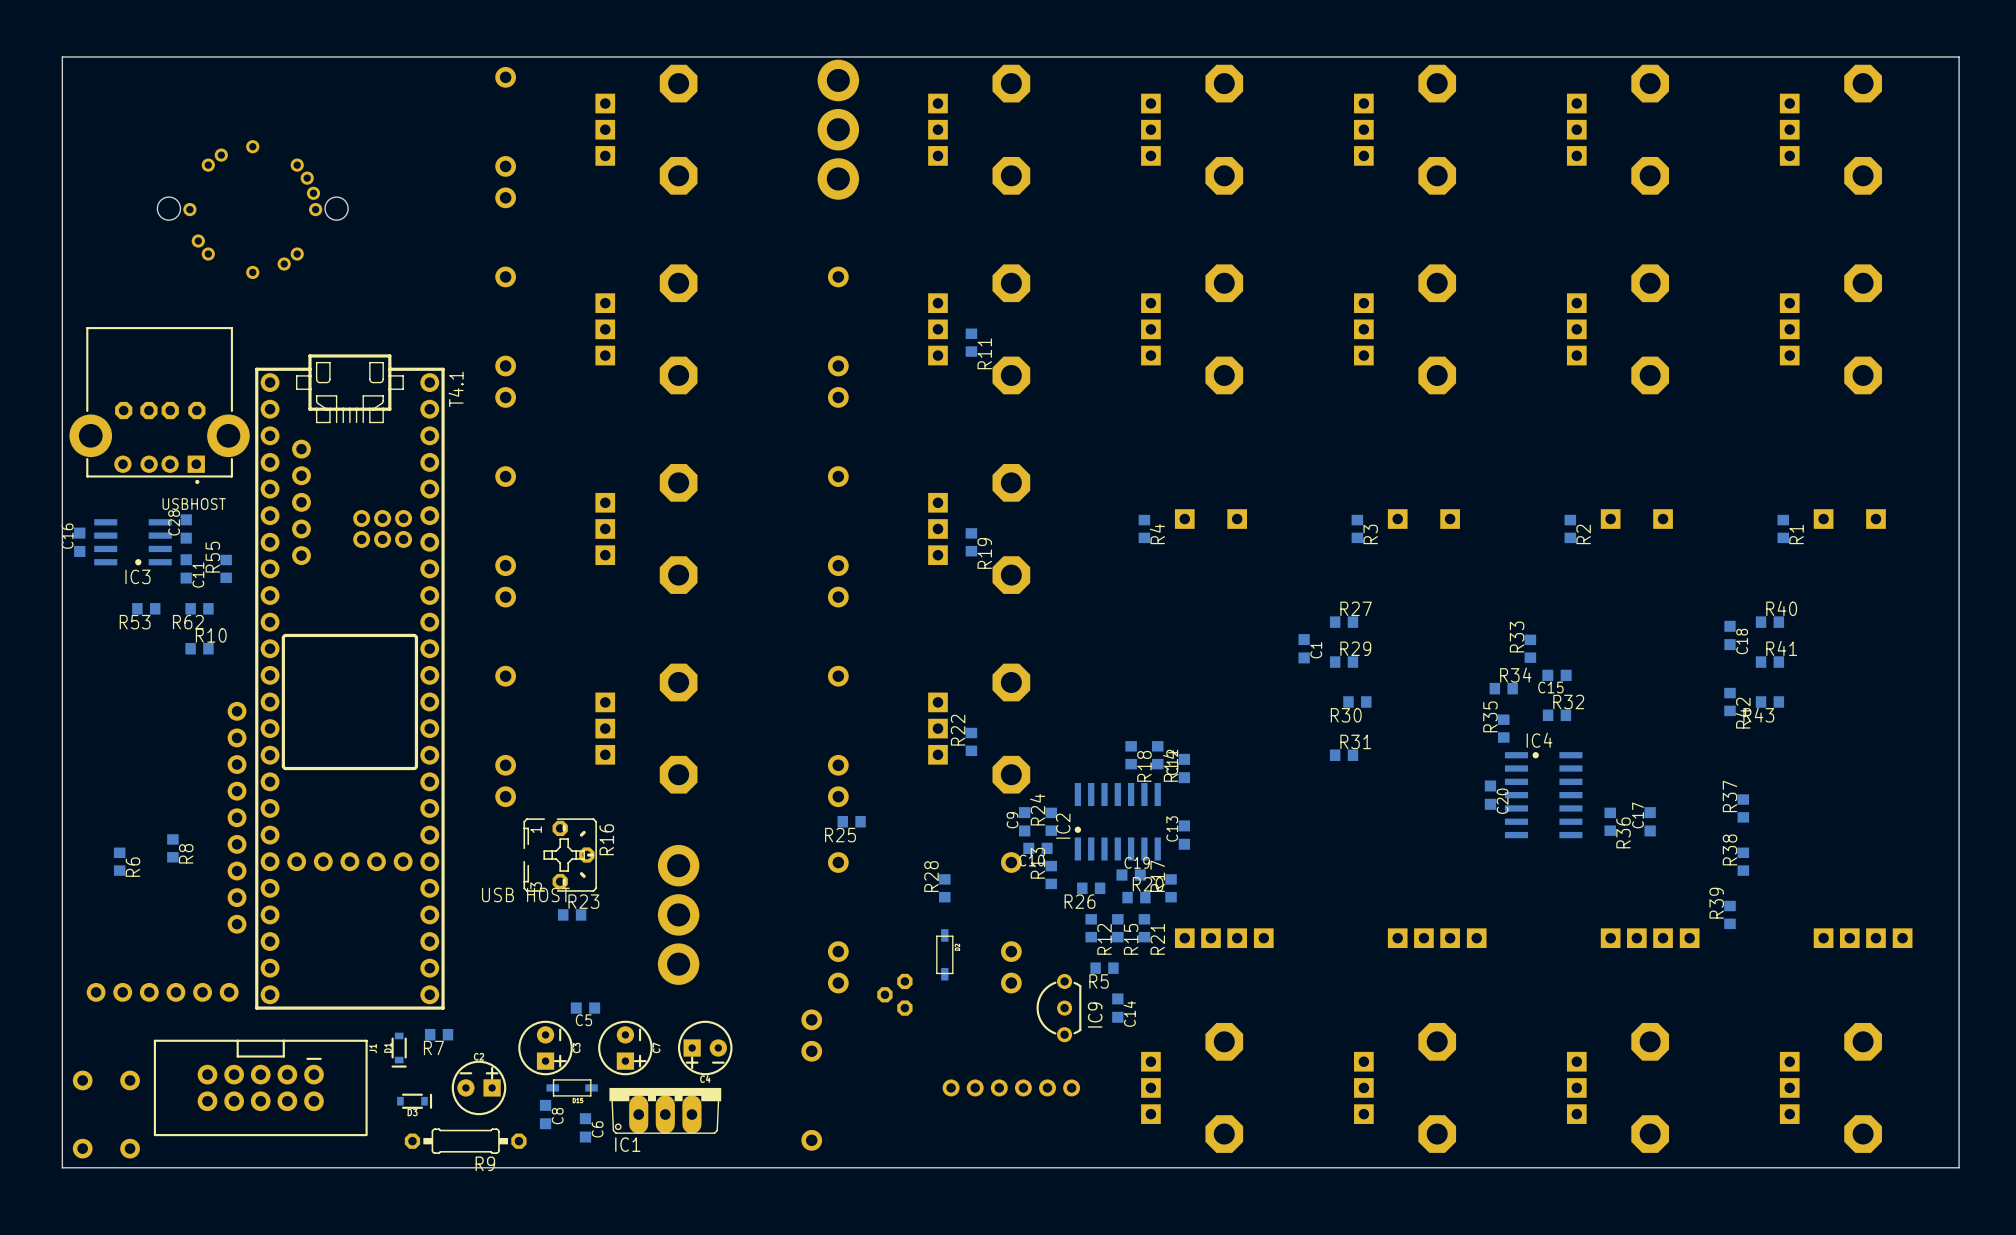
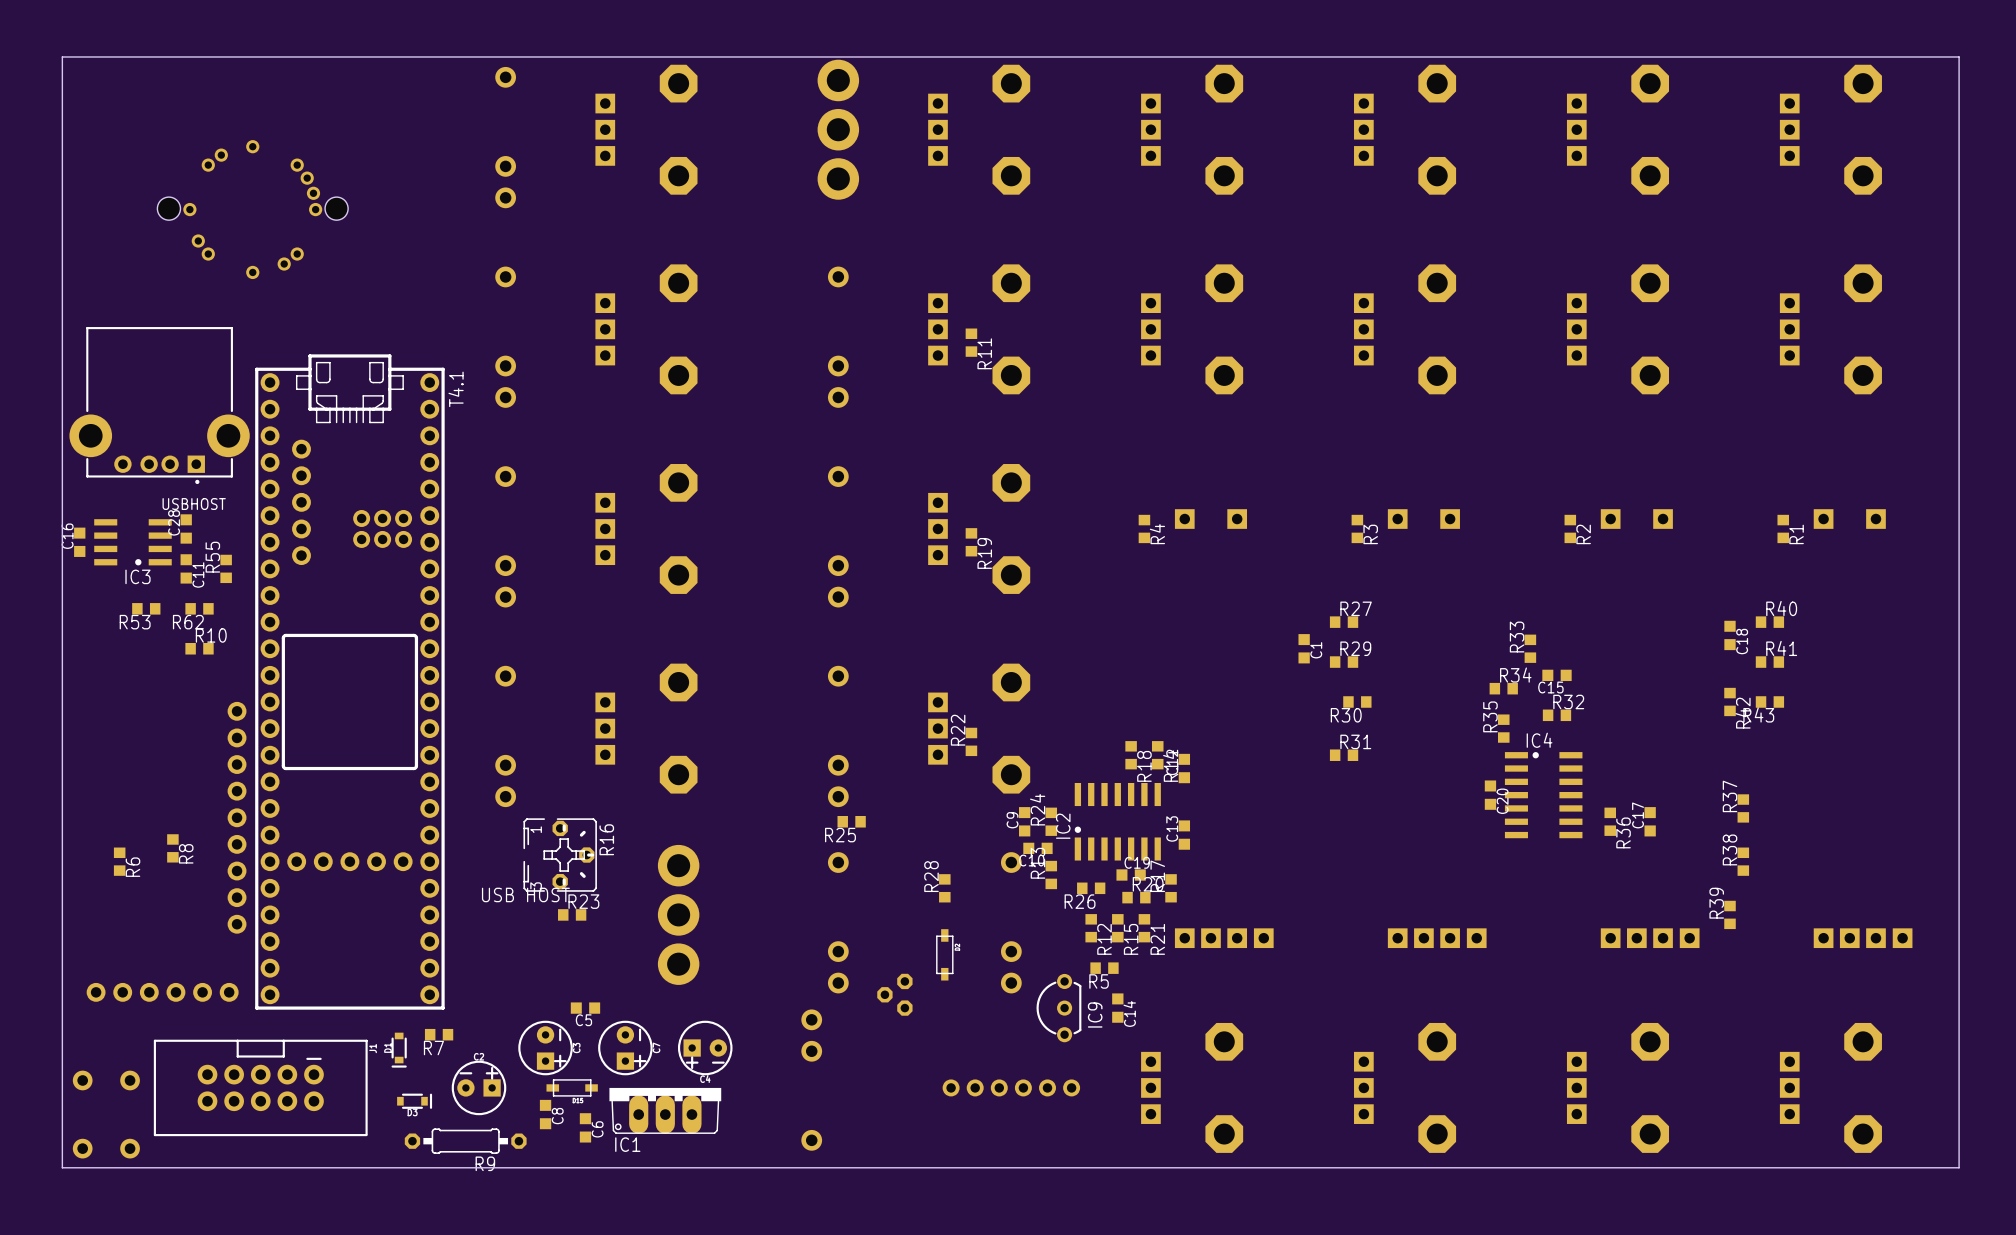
part: (123, 410) -> none
part: (148, 410) -> none
part: (170, 410) -> none
part: (196, 410) -> none

